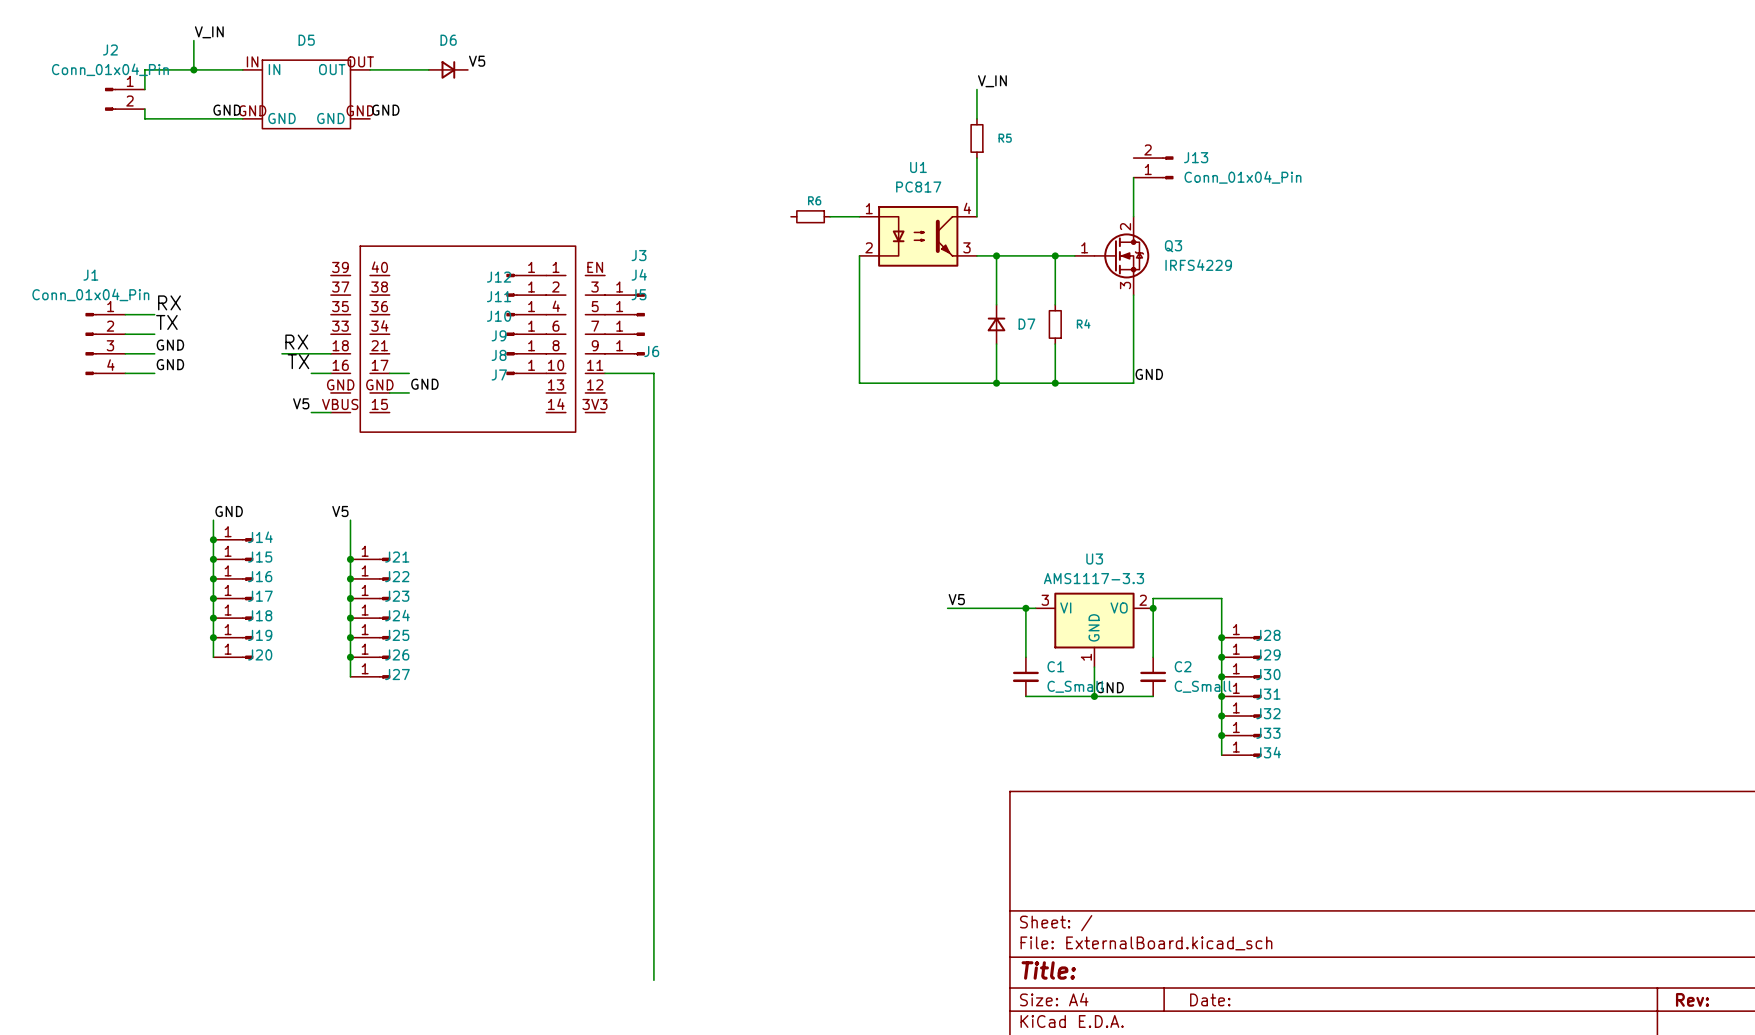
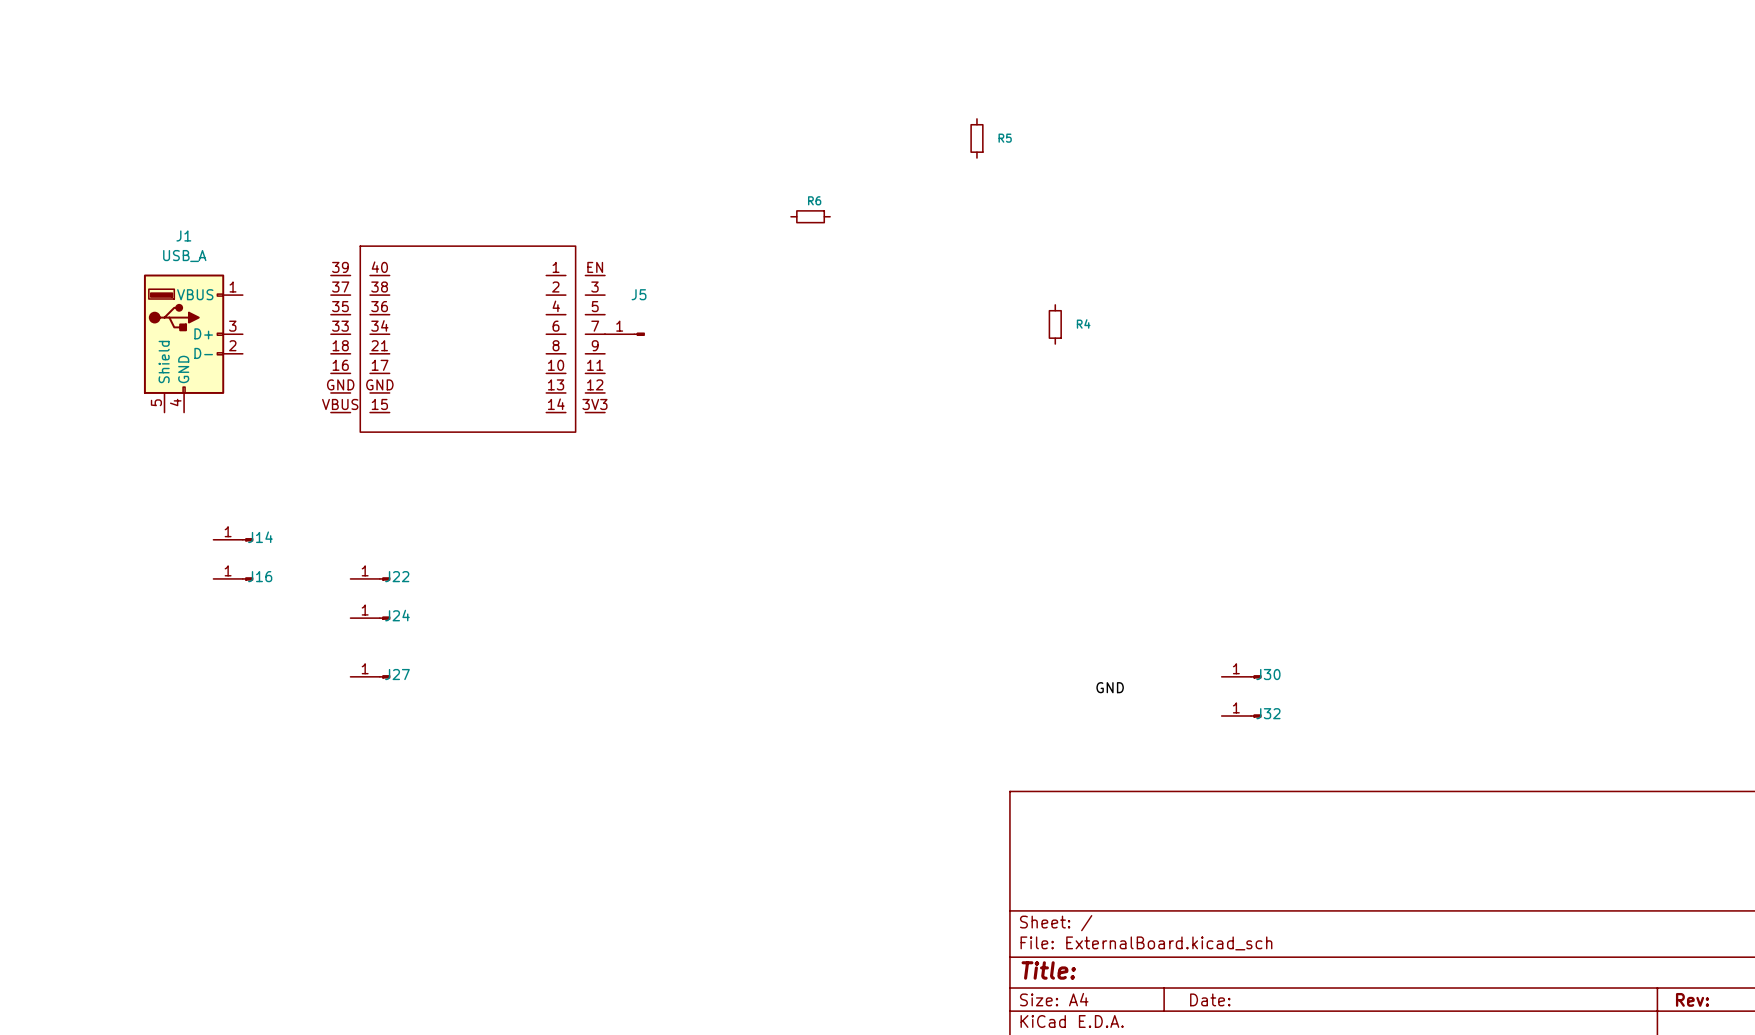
label: V_IN (209, 32) -> none
wire: (193, 40) (193, 69) -> none
label: V5 (477, 61) -> none
junction: (193, 69) -> none
wire: (242, 69) (144, 69) (144, 89) -> none
wire: (370, 69) (428, 69) -> none
D6: (448, 69) -> none
label: V_IN (992, 81) -> none
wire: (976, 89) (976, 118) -> none
D5: (306, 94) -> none
J2: Conn_01x04_Pin (125, 99) -> none
wire: (144, 109) (144, 118) (242, 118) -> none
label: GND (227, 110) -> none
label: GND (385, 110) -> none
wire: (976, 158) (976, 216) -> none
J13: Conn_01x04_Pin (1153, 167) -> none
wire: (1133, 177) (1133, 216) -> none
wire: (830, 216) (859, 216) -> none
U1: PC817 (918, 236) -> none
wire: (859, 255) (859, 383) (1133, 383) (1133, 295) -> none
wire: (976, 255) (1074, 255) -> none
wire: (996, 255) (996, 304) -> none
junction: (996, 255) -> none
wire: (1055, 255) (1055, 304) -> none
junction: (1055, 255) -> none
Q3: IRFS4229 (1112, 255) -> none
J1 name position: J1 (90, 275) -> J1 (183, 235)
J12: (526, 275) -> none
J1 value: Conn_01x04_Pin (90, 294) -> USB_A (184, 256)
J11: (526, 295) -> none
J3: (624, 295) -> none
label: RX (169, 302) -> none
J1 symbol: [85, 313, 126, 375] -> [143, 274, 243, 413]
wire: (125, 314) (154, 314) -> none
J10: (526, 314) -> none
J4: (624, 314) -> none
label: TX (166, 322) -> none
D7: (996, 324) -> none
wire: (125, 334) (154, 334) -> none
J9: (526, 334) -> none
label: RX (296, 342) -> none
wire: (996, 344) (996, 383) -> none
wire: (1055, 344) (1055, 383) -> none
label: GND (170, 345) -> none
wire: (125, 353) (154, 353) -> none
wire: (281, 353) (330, 353) -> none
J8: (526, 353) -> none
J6: (624, 353) -> none
label: TX (298, 361) -> none
label: GND (170, 364) -> none
wire: (125, 373) (154, 373) -> none
wire: (311, 373) (330, 373) -> none
wire: (389, 373) (409, 373) -> none
J7: (526, 373) -> none
wire: (604, 373) (653, 373) (653, 980) -> none
label: GND (1149, 374) -> none
junction: (996, 383) -> none
junction: (1055, 383) -> none
label: GND (424, 384) -> none
wire: (389, 392) (409, 392) -> none
label: V5 (301, 403) -> none
wire: (311, 412) (330, 412) -> none
label: GND (229, 511) -> none
label: V5 (340, 511) -> none
wire: (213, 520) (213, 657) -> none
wire: (350, 520) (350, 676) -> none
junction: (213, 539) -> none
junction: (213, 559) -> none
J15: (233, 559) -> none
junction: (350, 559) -> none
J21: (370, 559) -> none
junction: (213, 578) -> none
junction: (350, 578) -> none
junction: (213, 598) -> none
J17: (233, 598) -> none
junction: (350, 598) -> none
J23: (370, 598) -> none
label: V5 (956, 599) -> none
wire: (947, 608) (1035, 608) -> none
wire: (1025, 608) (1025, 657) -> none
junction: (1025, 608) -> none
junction: (1153, 608) -> none
junction: (213, 618) -> none
J18: (233, 618) -> none
junction: (350, 618) -> none
U3: AMS1117-3.3 (1094, 629) -> none
junction: (213, 637) -> none
J19: (233, 637) -> none
junction: (350, 637) -> none
J25: (370, 637) -> none
junction: (1221, 637) -> none
J28: (1241, 637) -> none
J20: (233, 657) -> none
junction: (350, 657) -> none
J26: (370, 657) -> none
wire: (1153, 657) (1153, 598) (1221, 598) (1221, 755) -> none
junction: (1221, 657) -> none
J29: (1241, 657) -> none
wire: (1094, 667) (1094, 696) -> none
C1: C_Small (1025, 676) -> none
C2: C_Small (1153, 676) -> none
junction: (1221, 676) -> none
wire: (1025, 696) (1153, 696) -> none
junction: (1094, 696) -> none
junction: (1221, 696) -> none
J31: (1241, 696) -> none
junction: (1221, 716) -> none
junction: (1221, 735) -> none
J33: (1241, 735) -> none
J34: (1241, 755) -> none

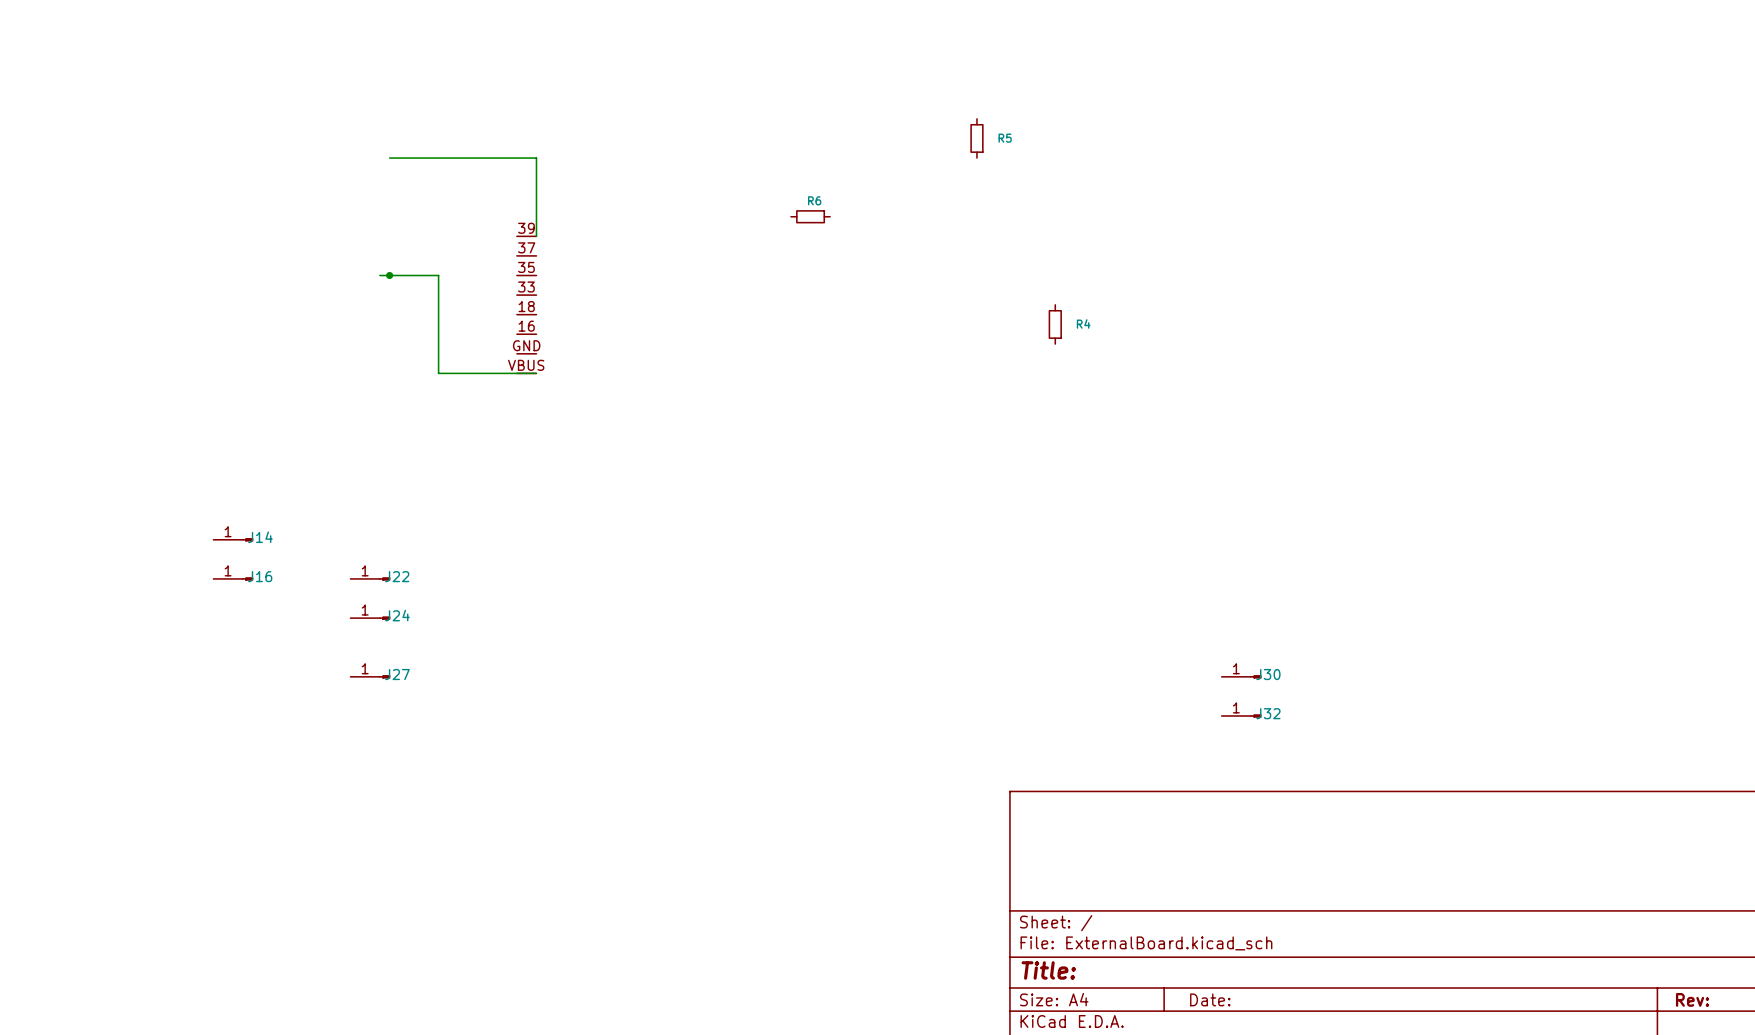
wire: none -> (389, 158) (536, 158) (536, 236)
wire: none -> (379, 275) (438, 275) (438, 373) (536, 373)
junction: none -> (389, 275)
part: none -> (526, 304)
J5: (624, 334) -> none
part: (467, 339) -> none
J1: USB_A (193, 343) -> none
label: GND (1110, 687) -> none

